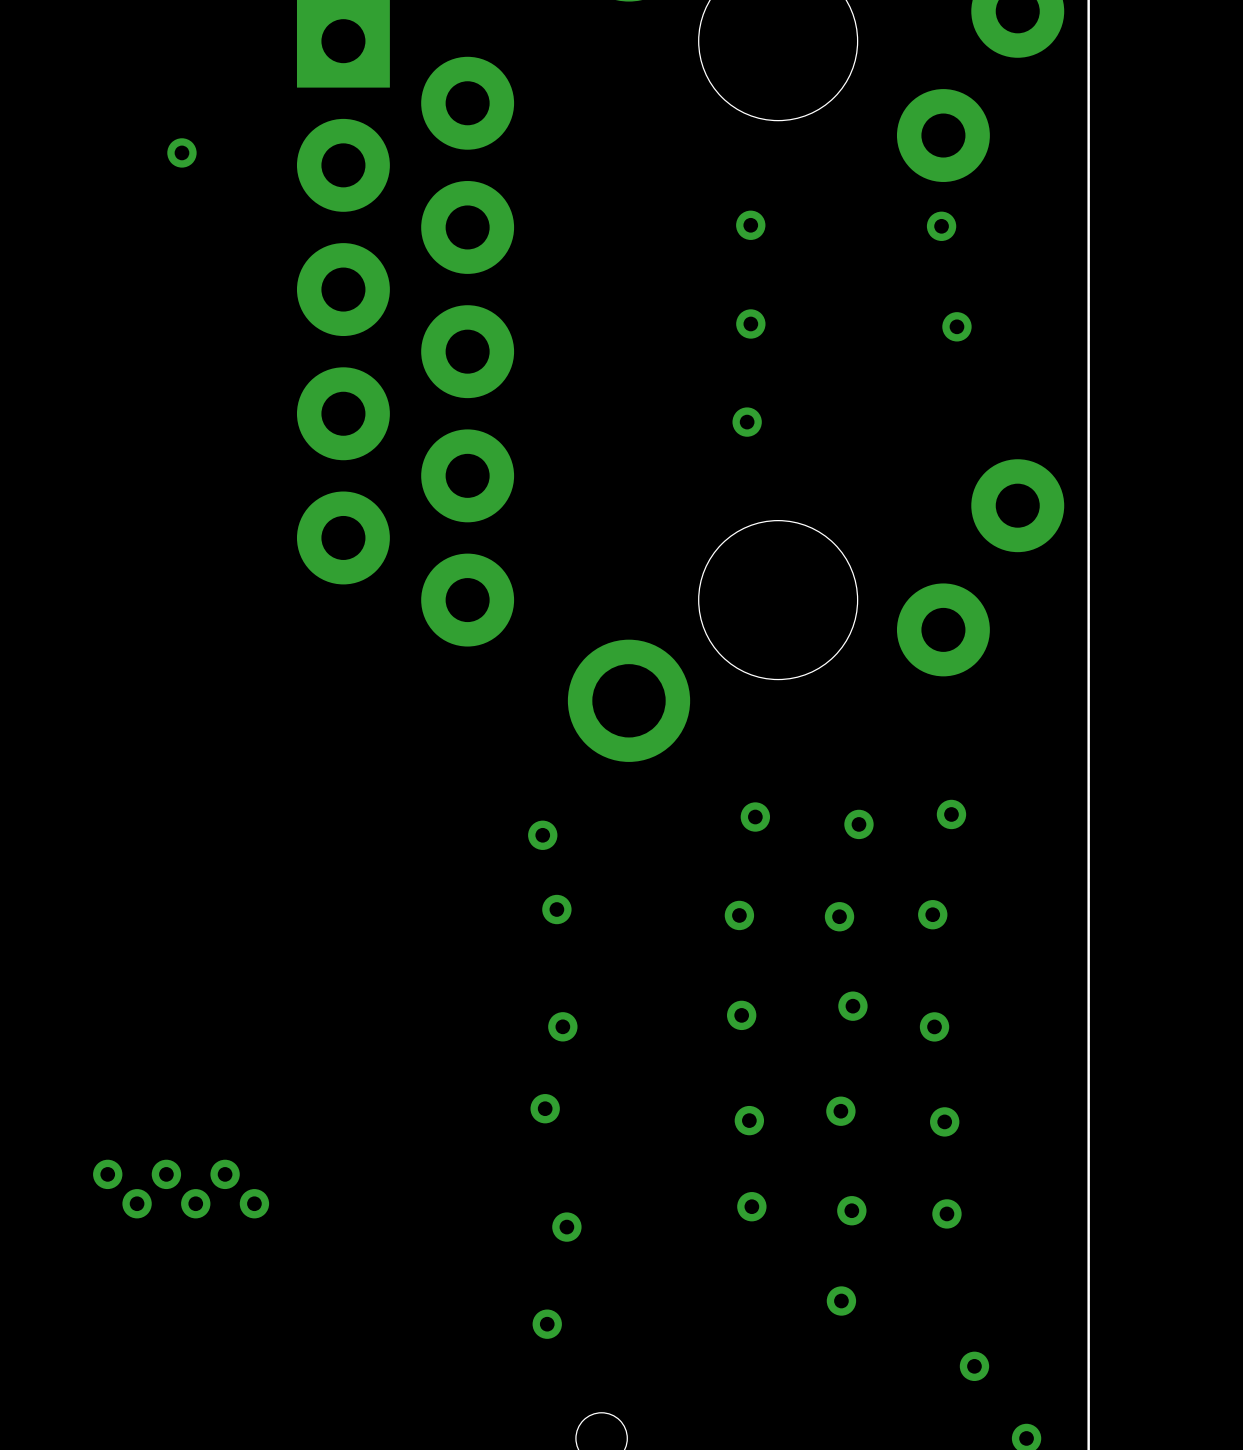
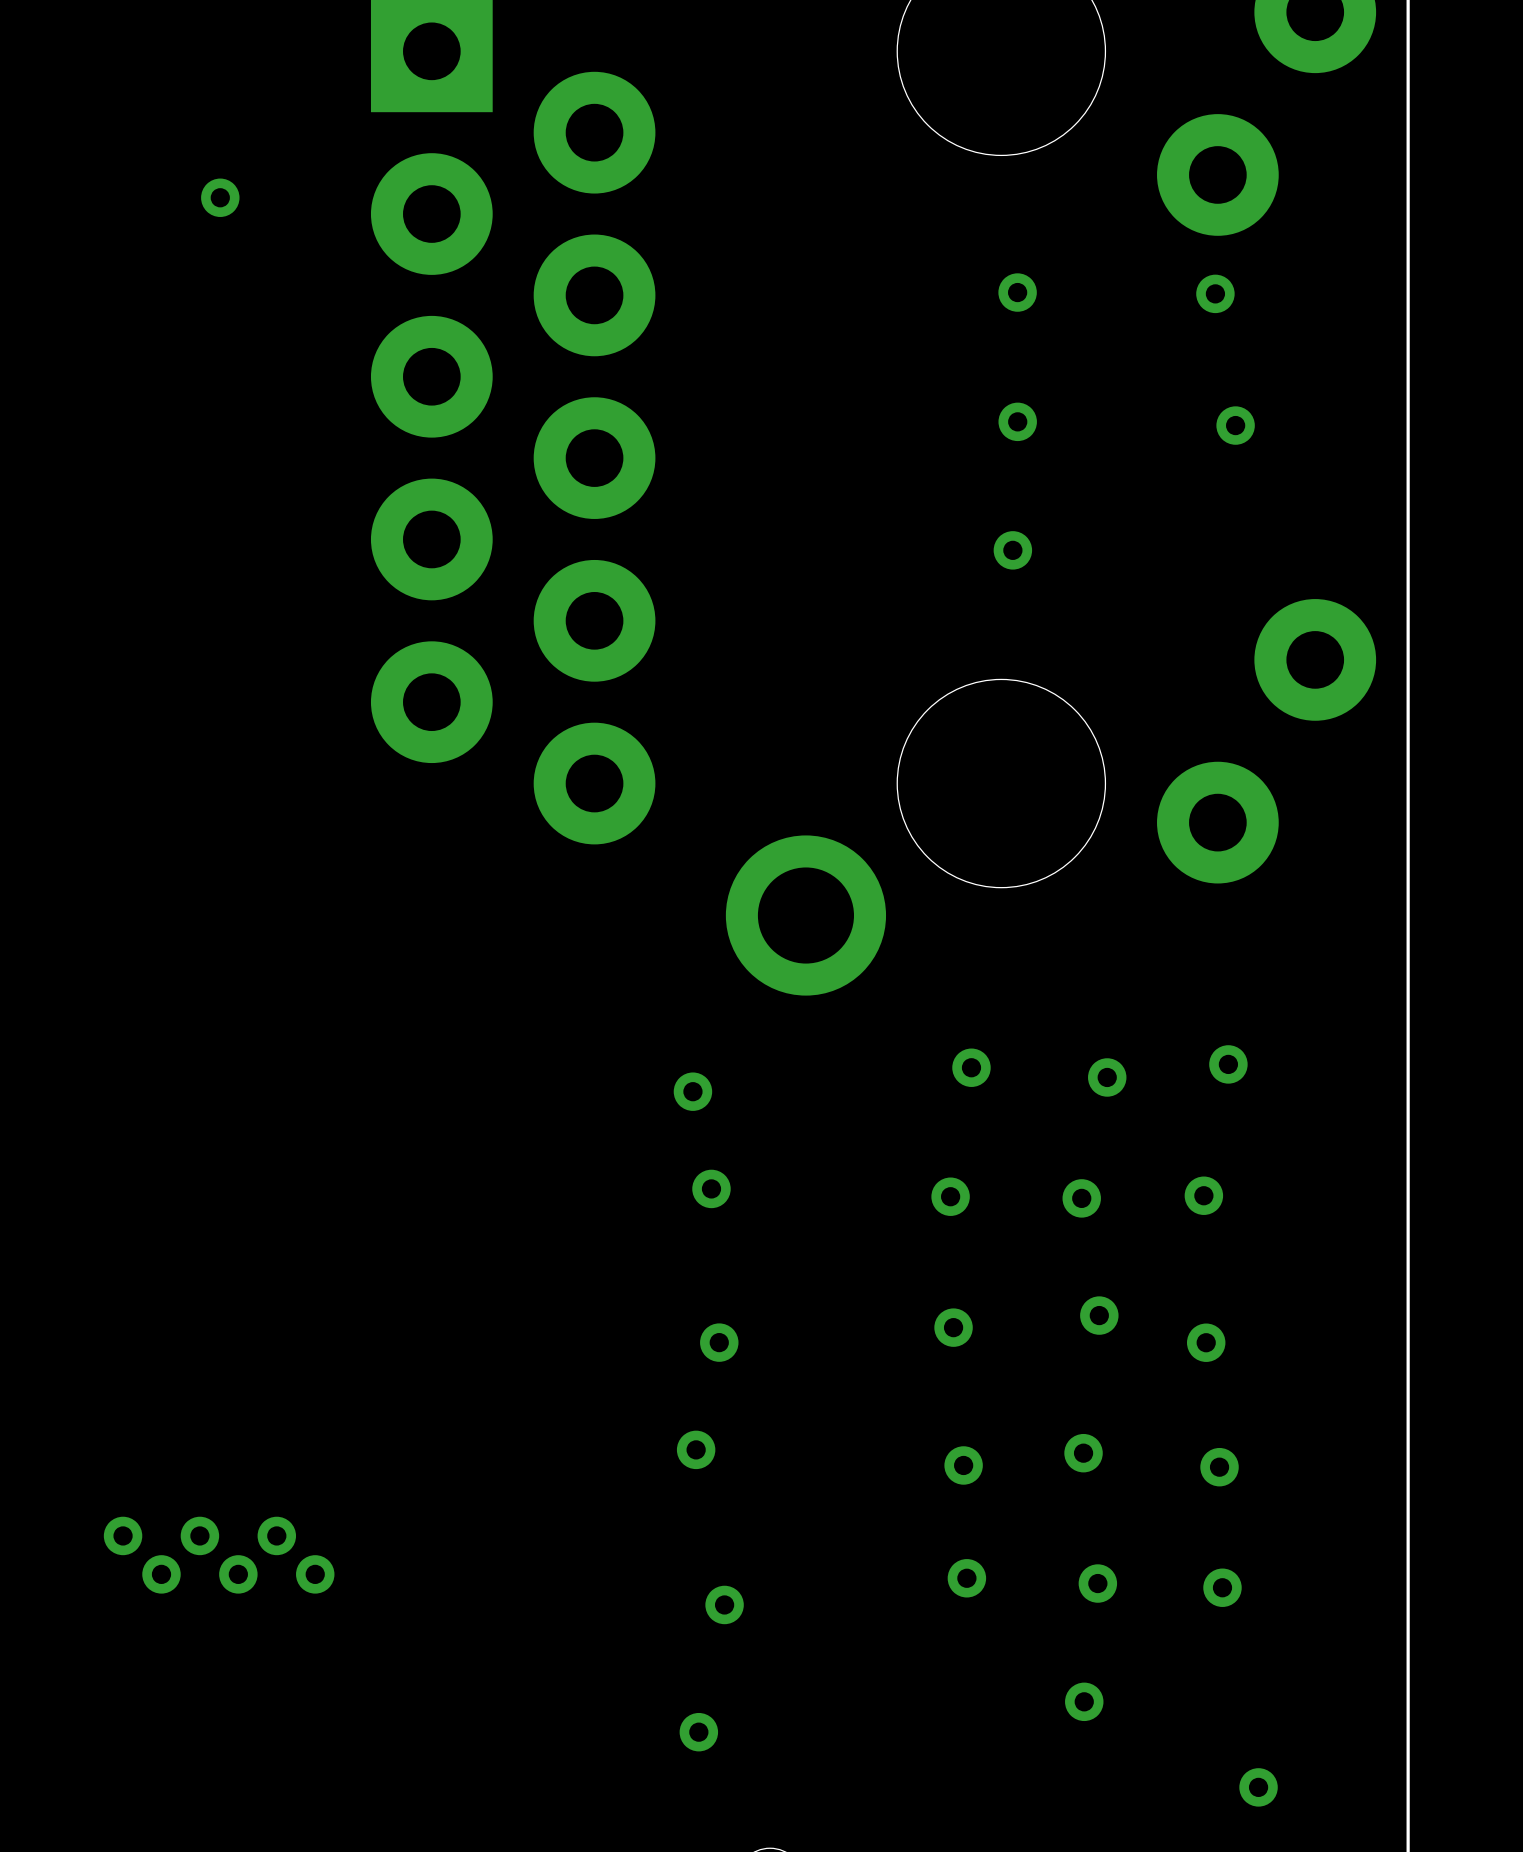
via position: (750, 225) -> (1017, 292)
via position: (750, 323) -> (1017, 421)
via position: (747, 422) -> (1012, 550)

